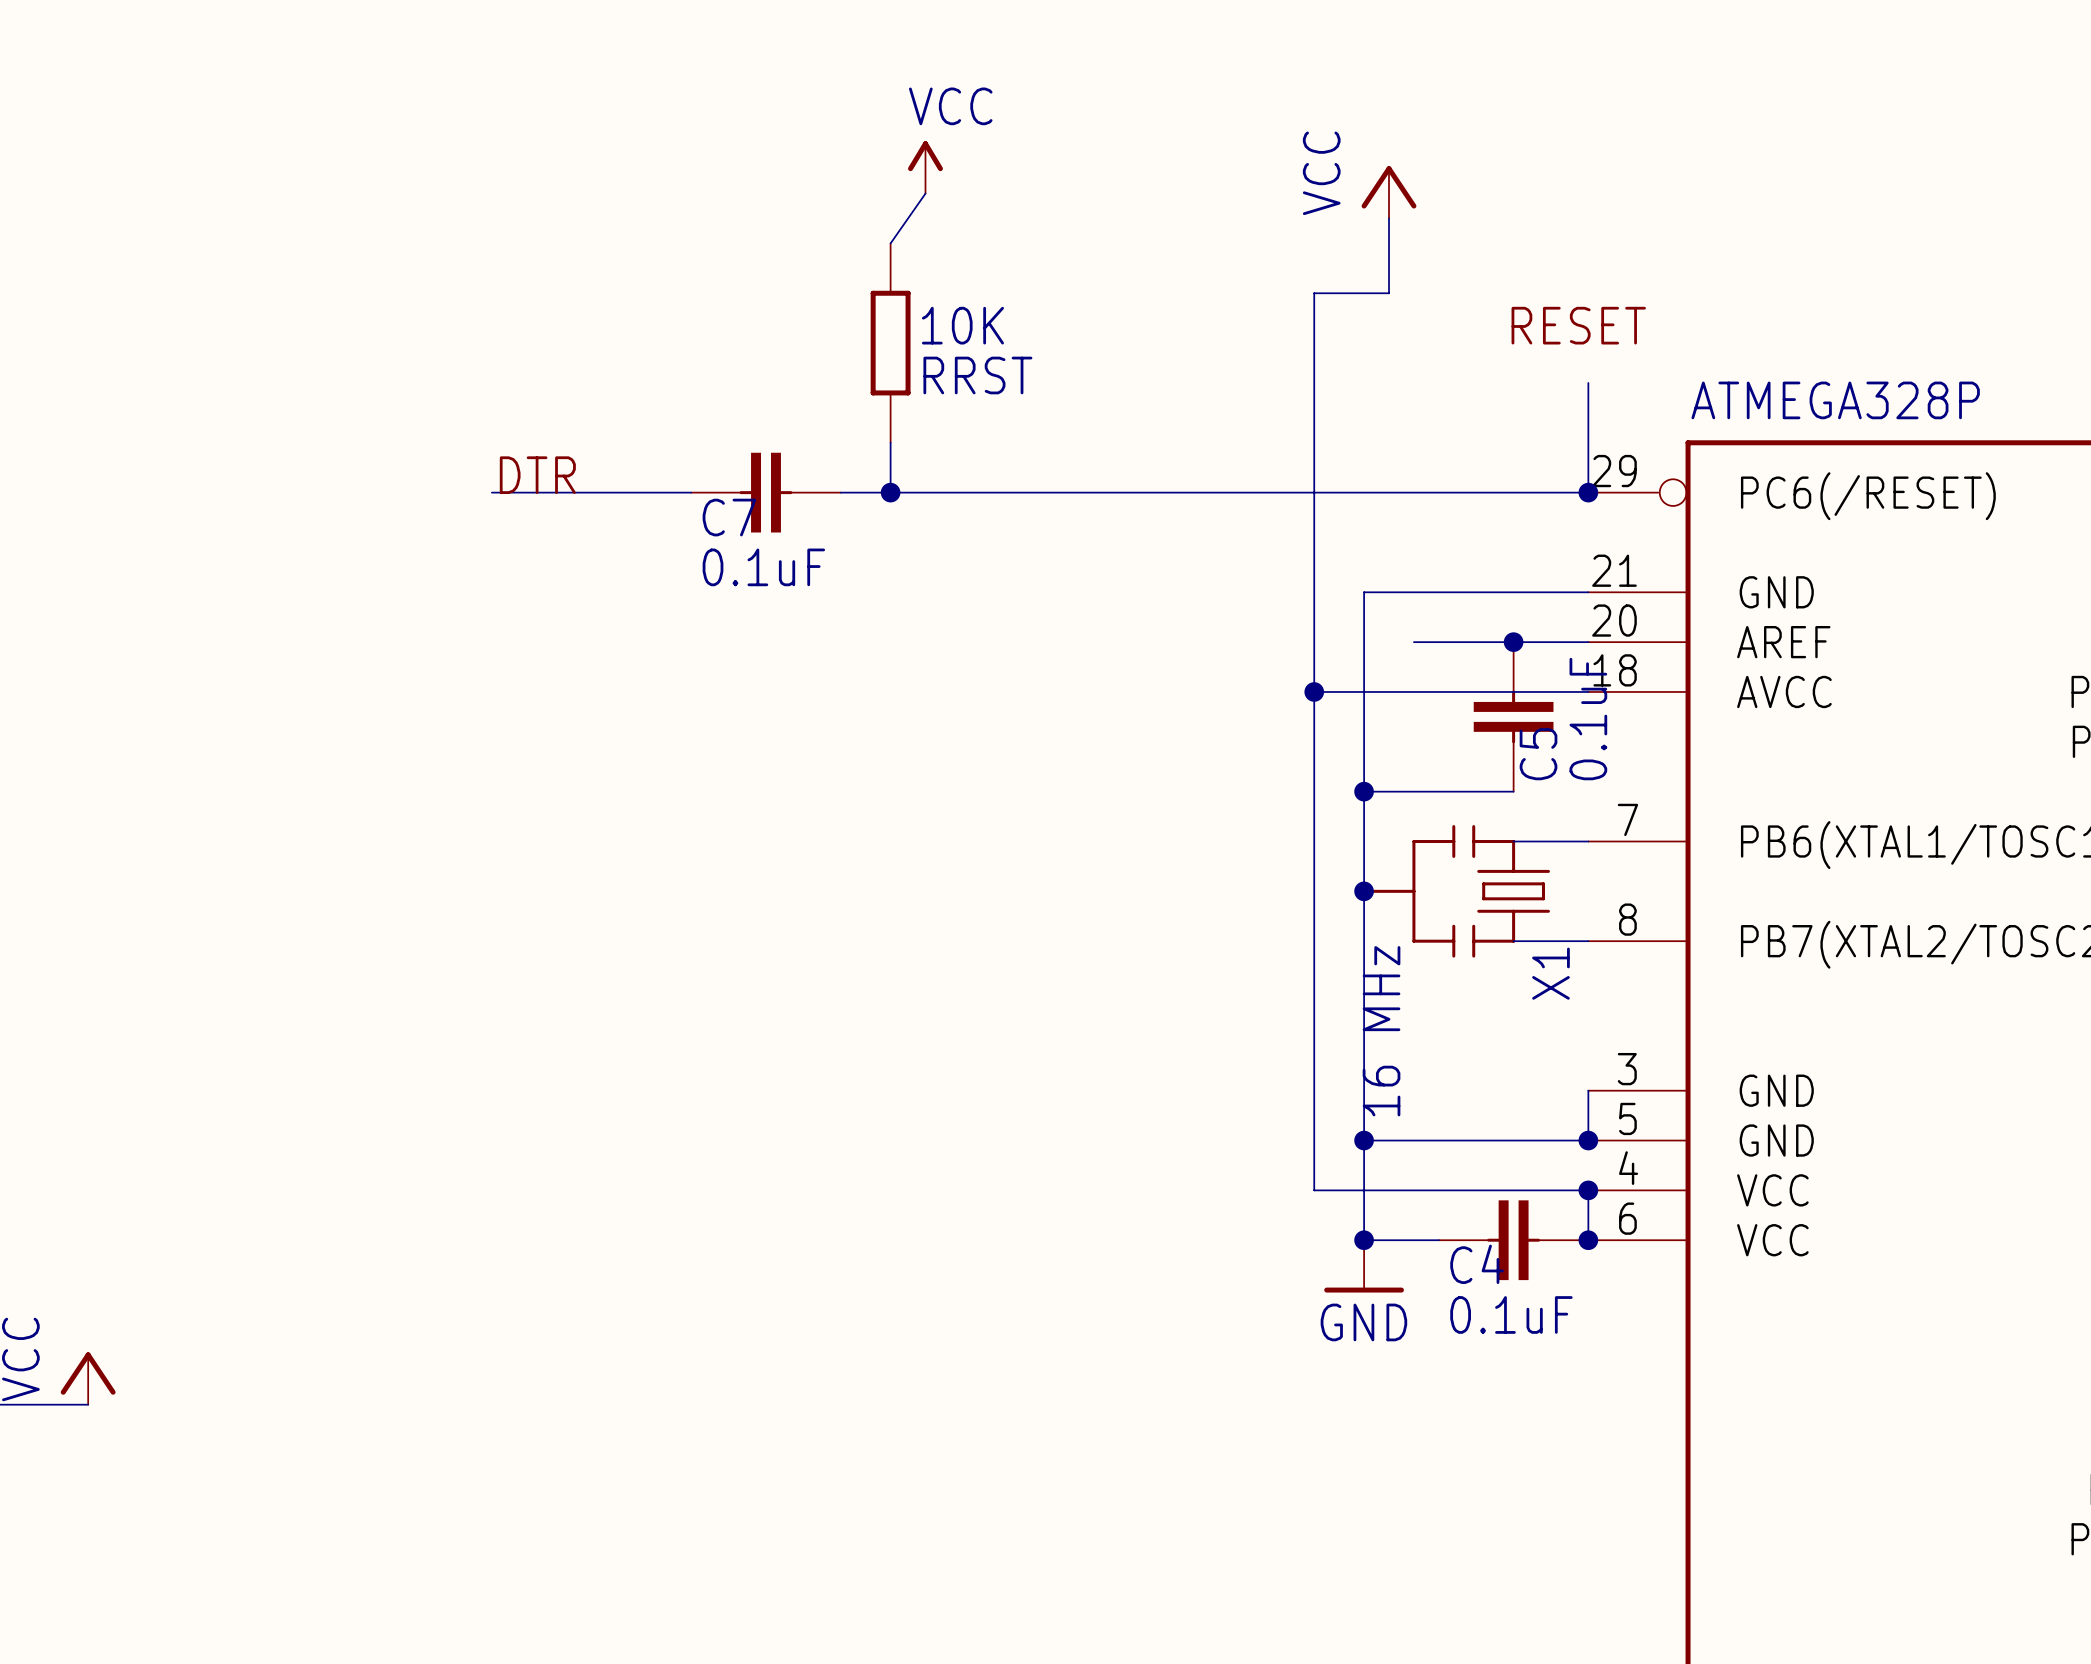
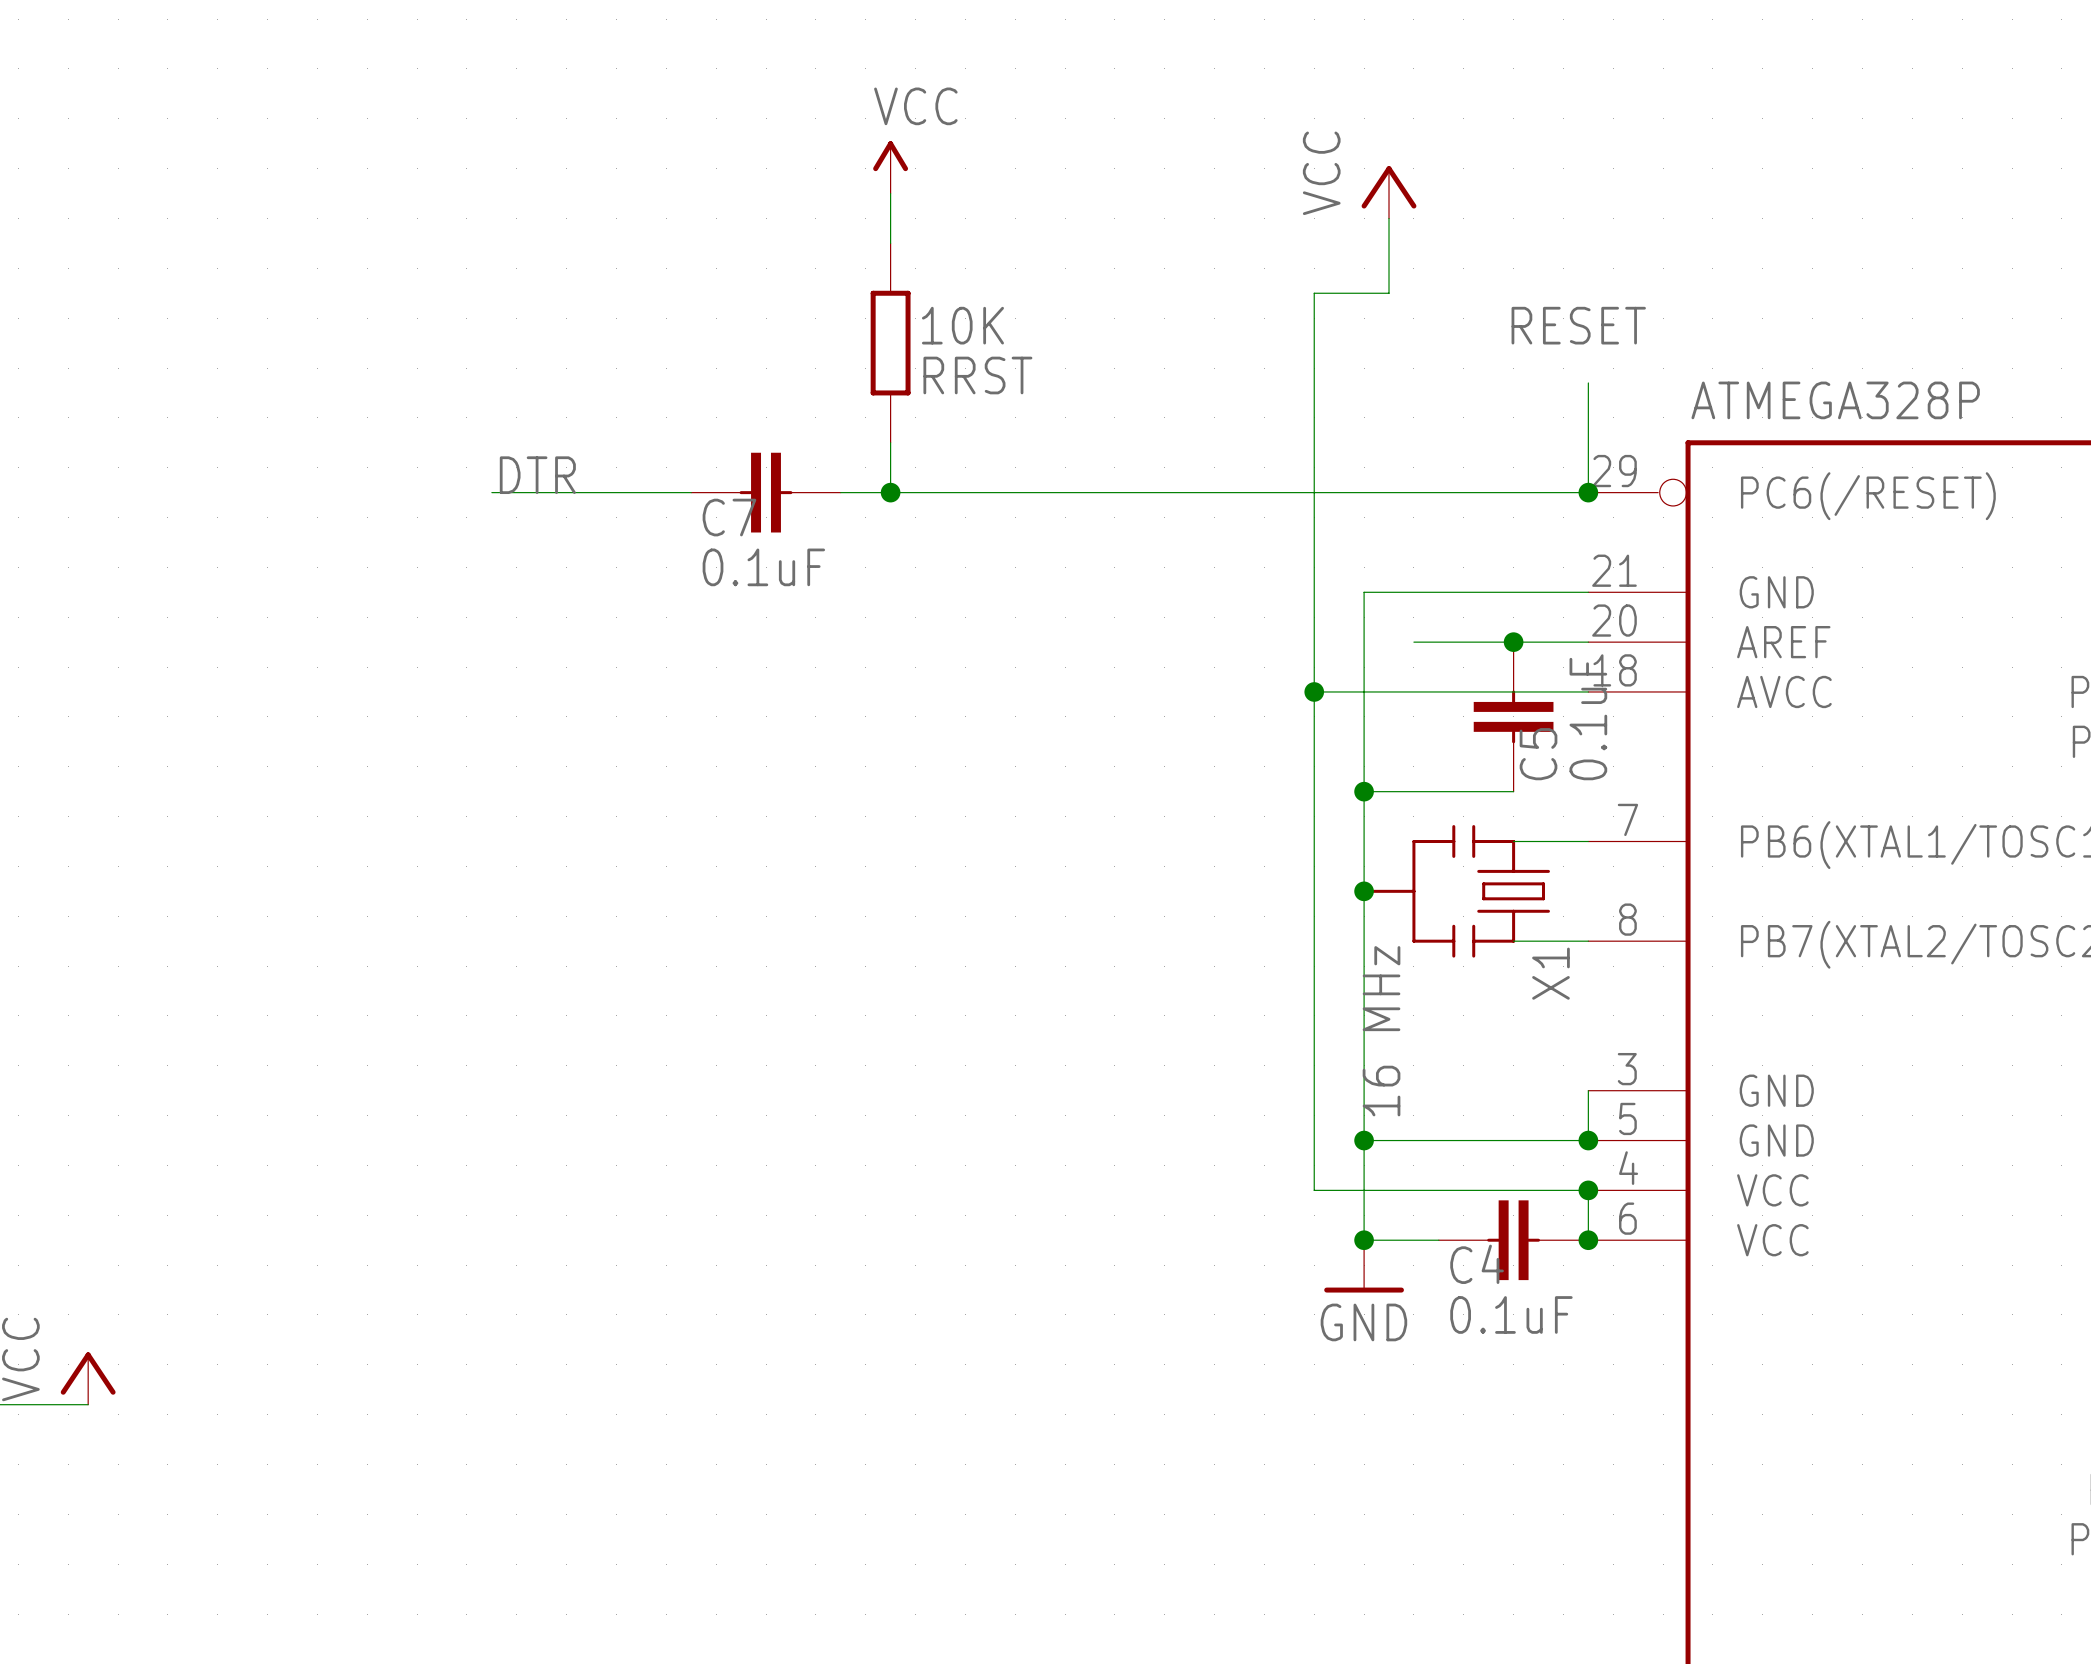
power symbol position: VCC (925, 167) -> VCC (890, 167)
wire: (925, 193) (890, 243) -> (890, 193) (890, 243)

